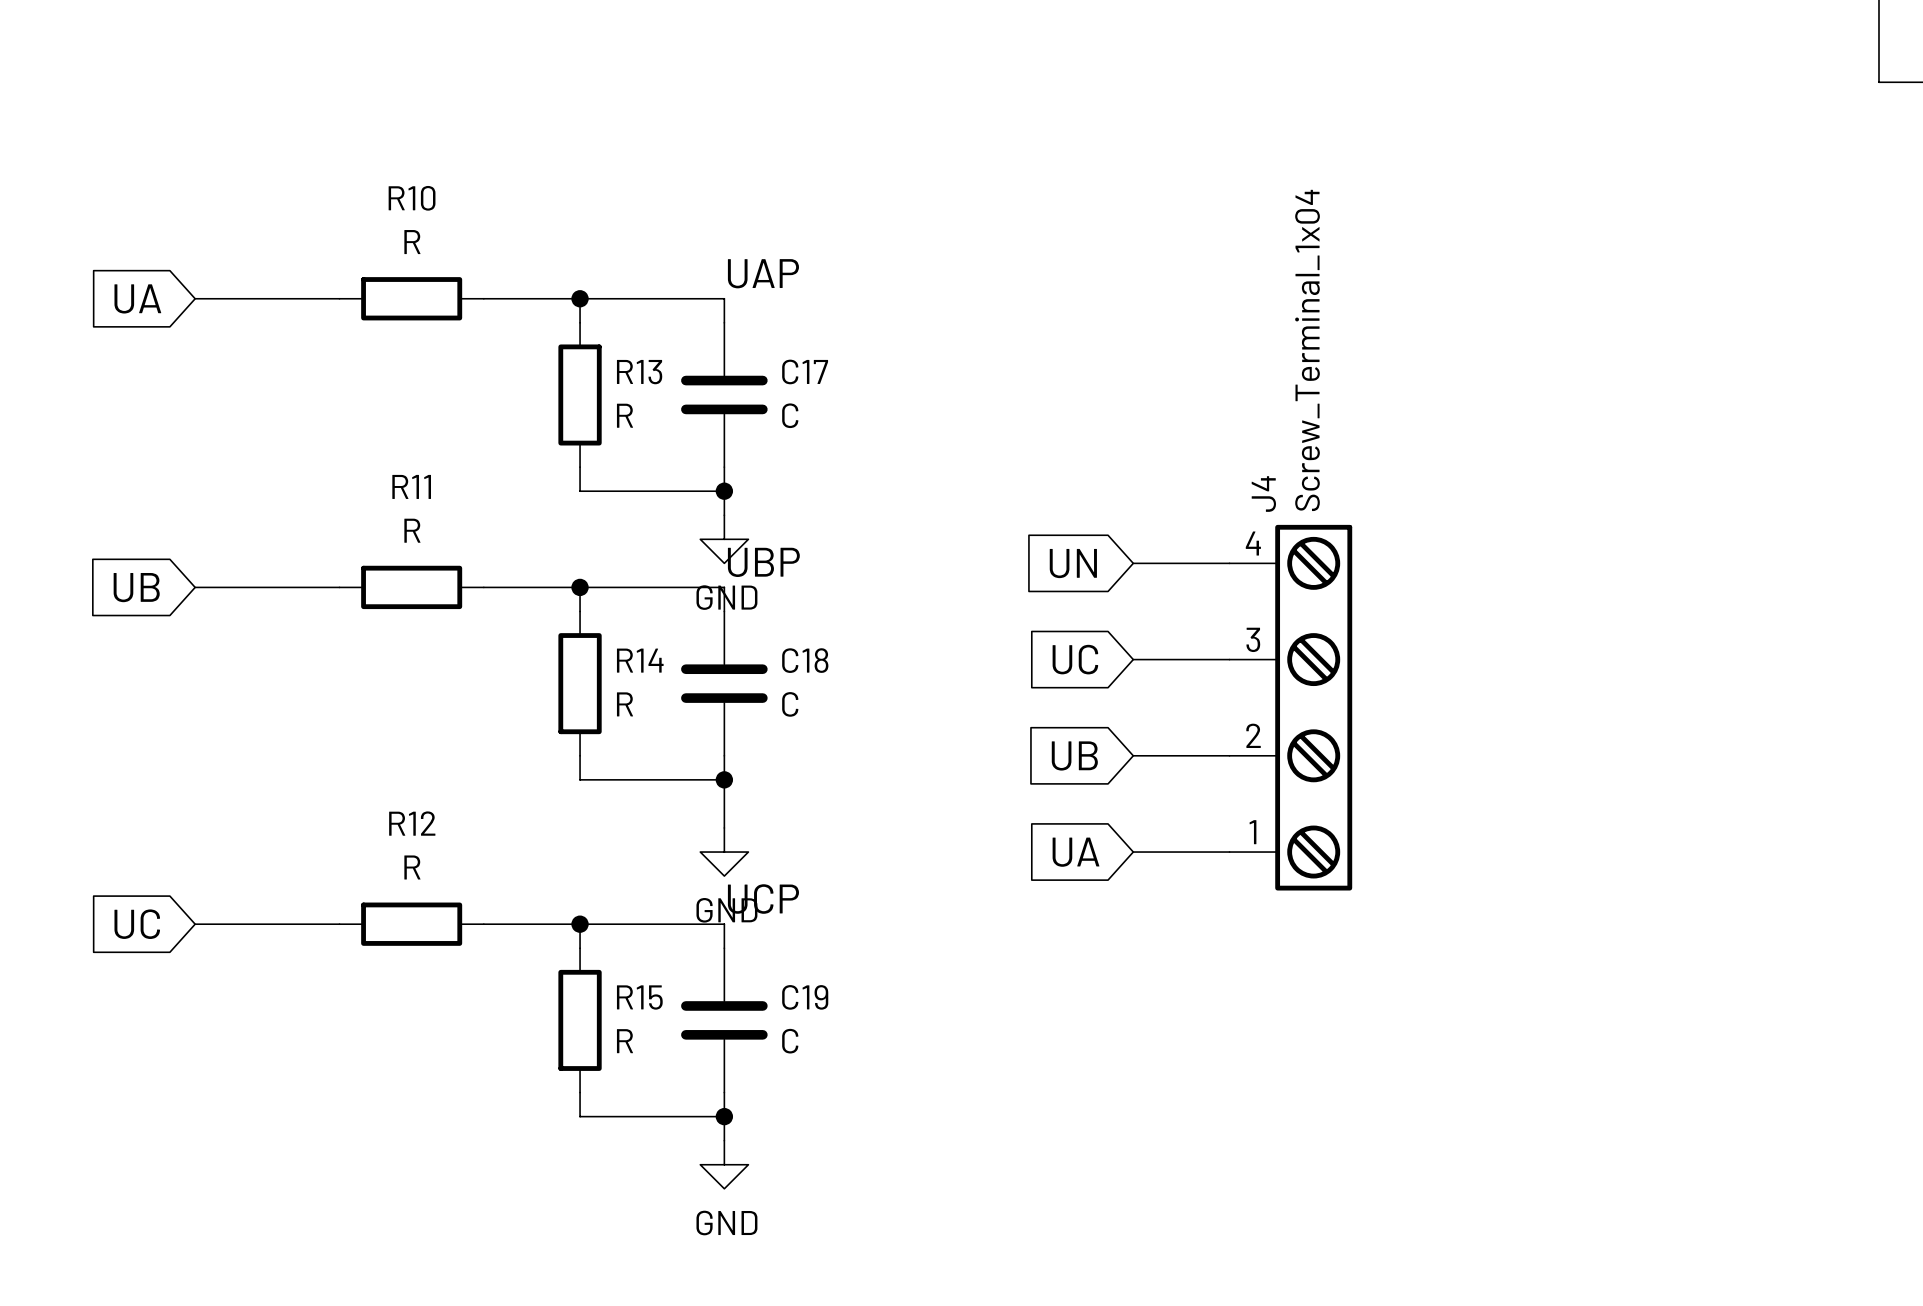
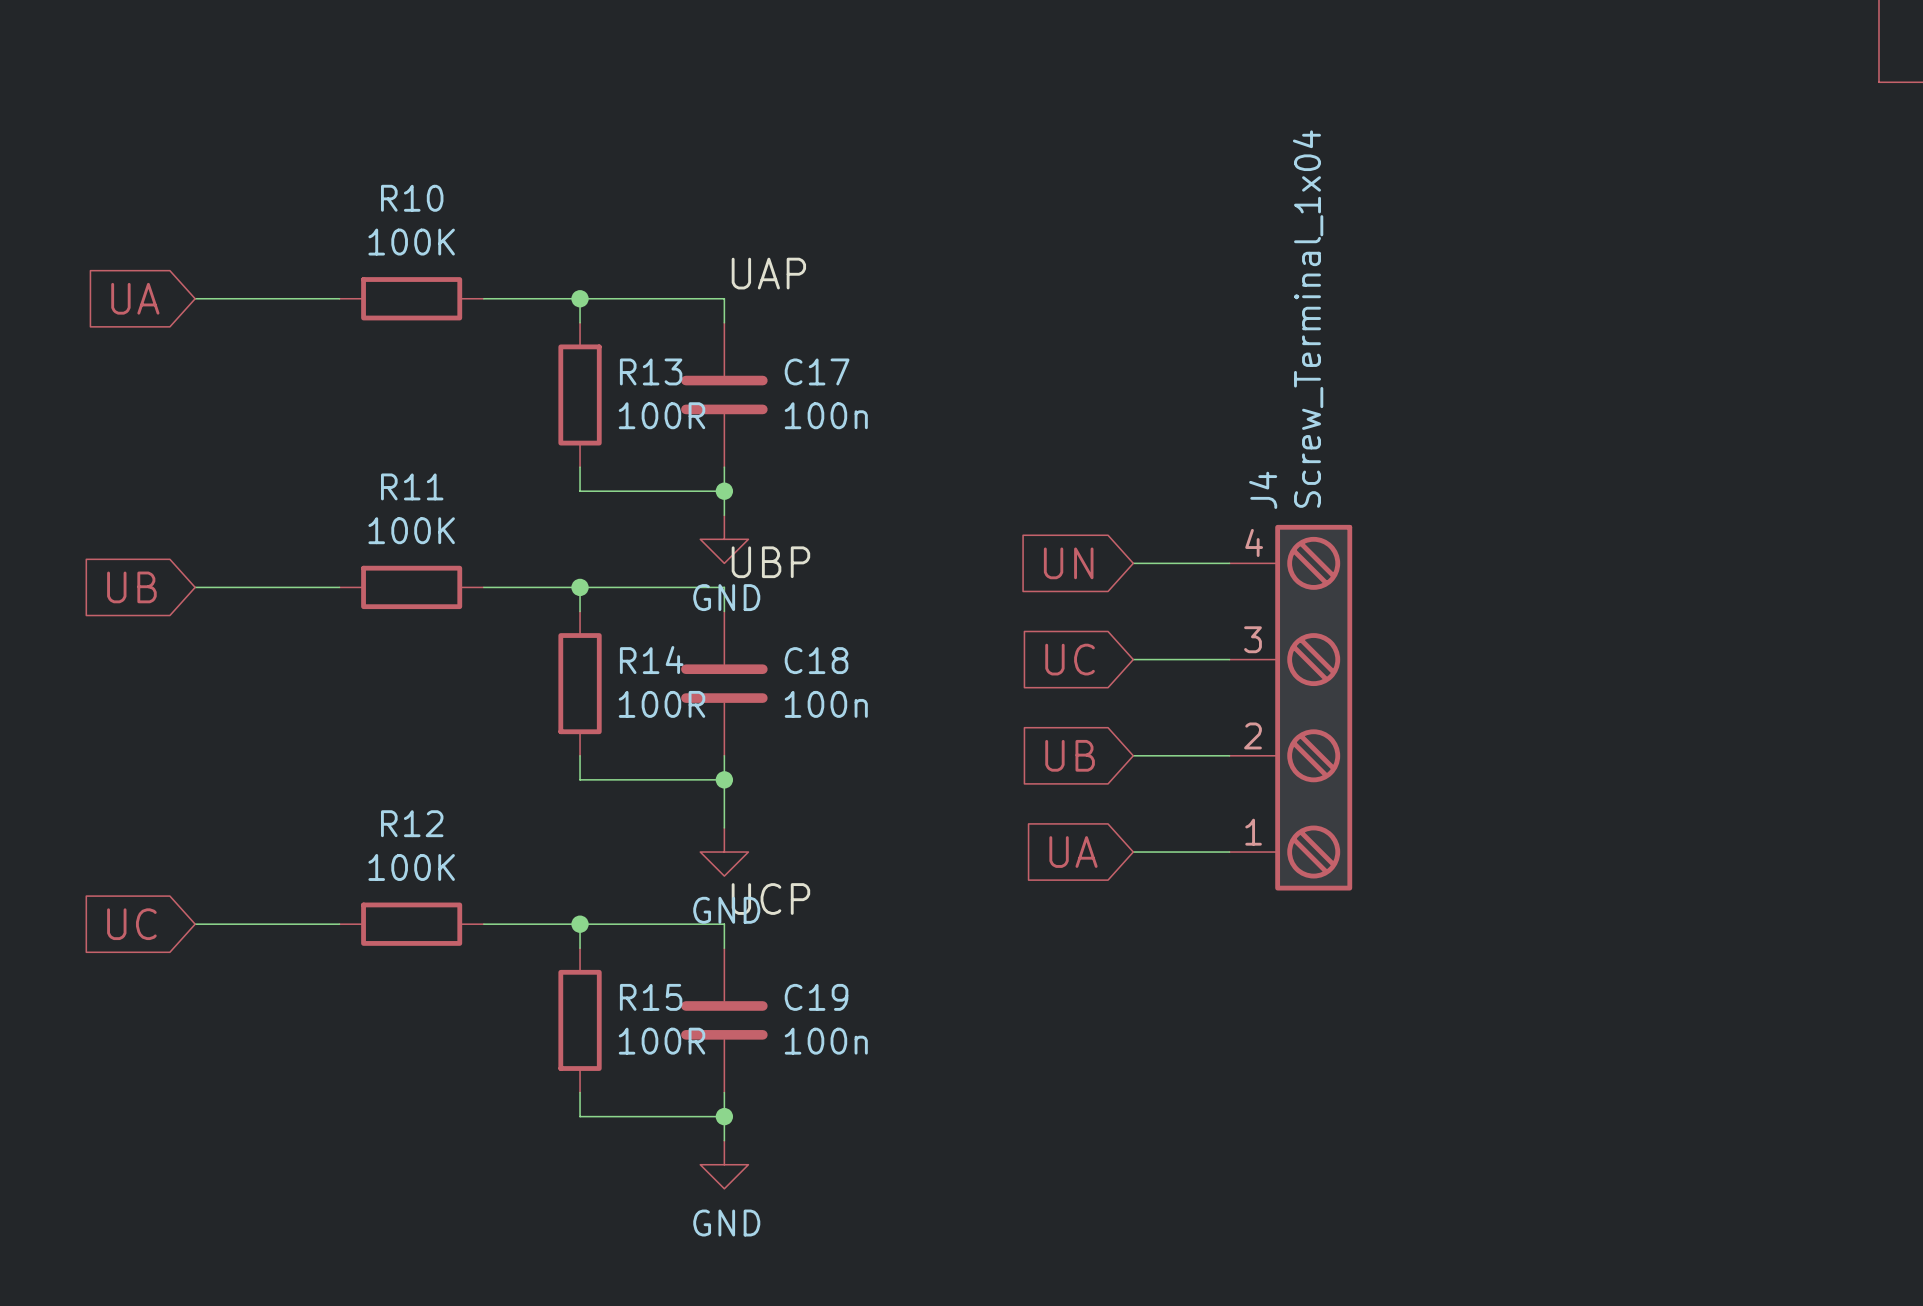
R10 value: R (412, 242) -> 100K (411, 242)
R13 value: R (625, 415) -> 100R (662, 415)
C17 value: C (790, 415) -> 100n (826, 415)
R11 value: R (412, 530) -> 100K (411, 530)
R14 value: R (625, 704) -> 100R (662, 704)
C18 value: C (790, 704) -> 100n (826, 704)
R12 value: R (412, 867) -> 100K (411, 867)
R15 value: R (625, 1041) -> 100R (662, 1041)
C19 value: C (790, 1041) -> 100n (826, 1041)

